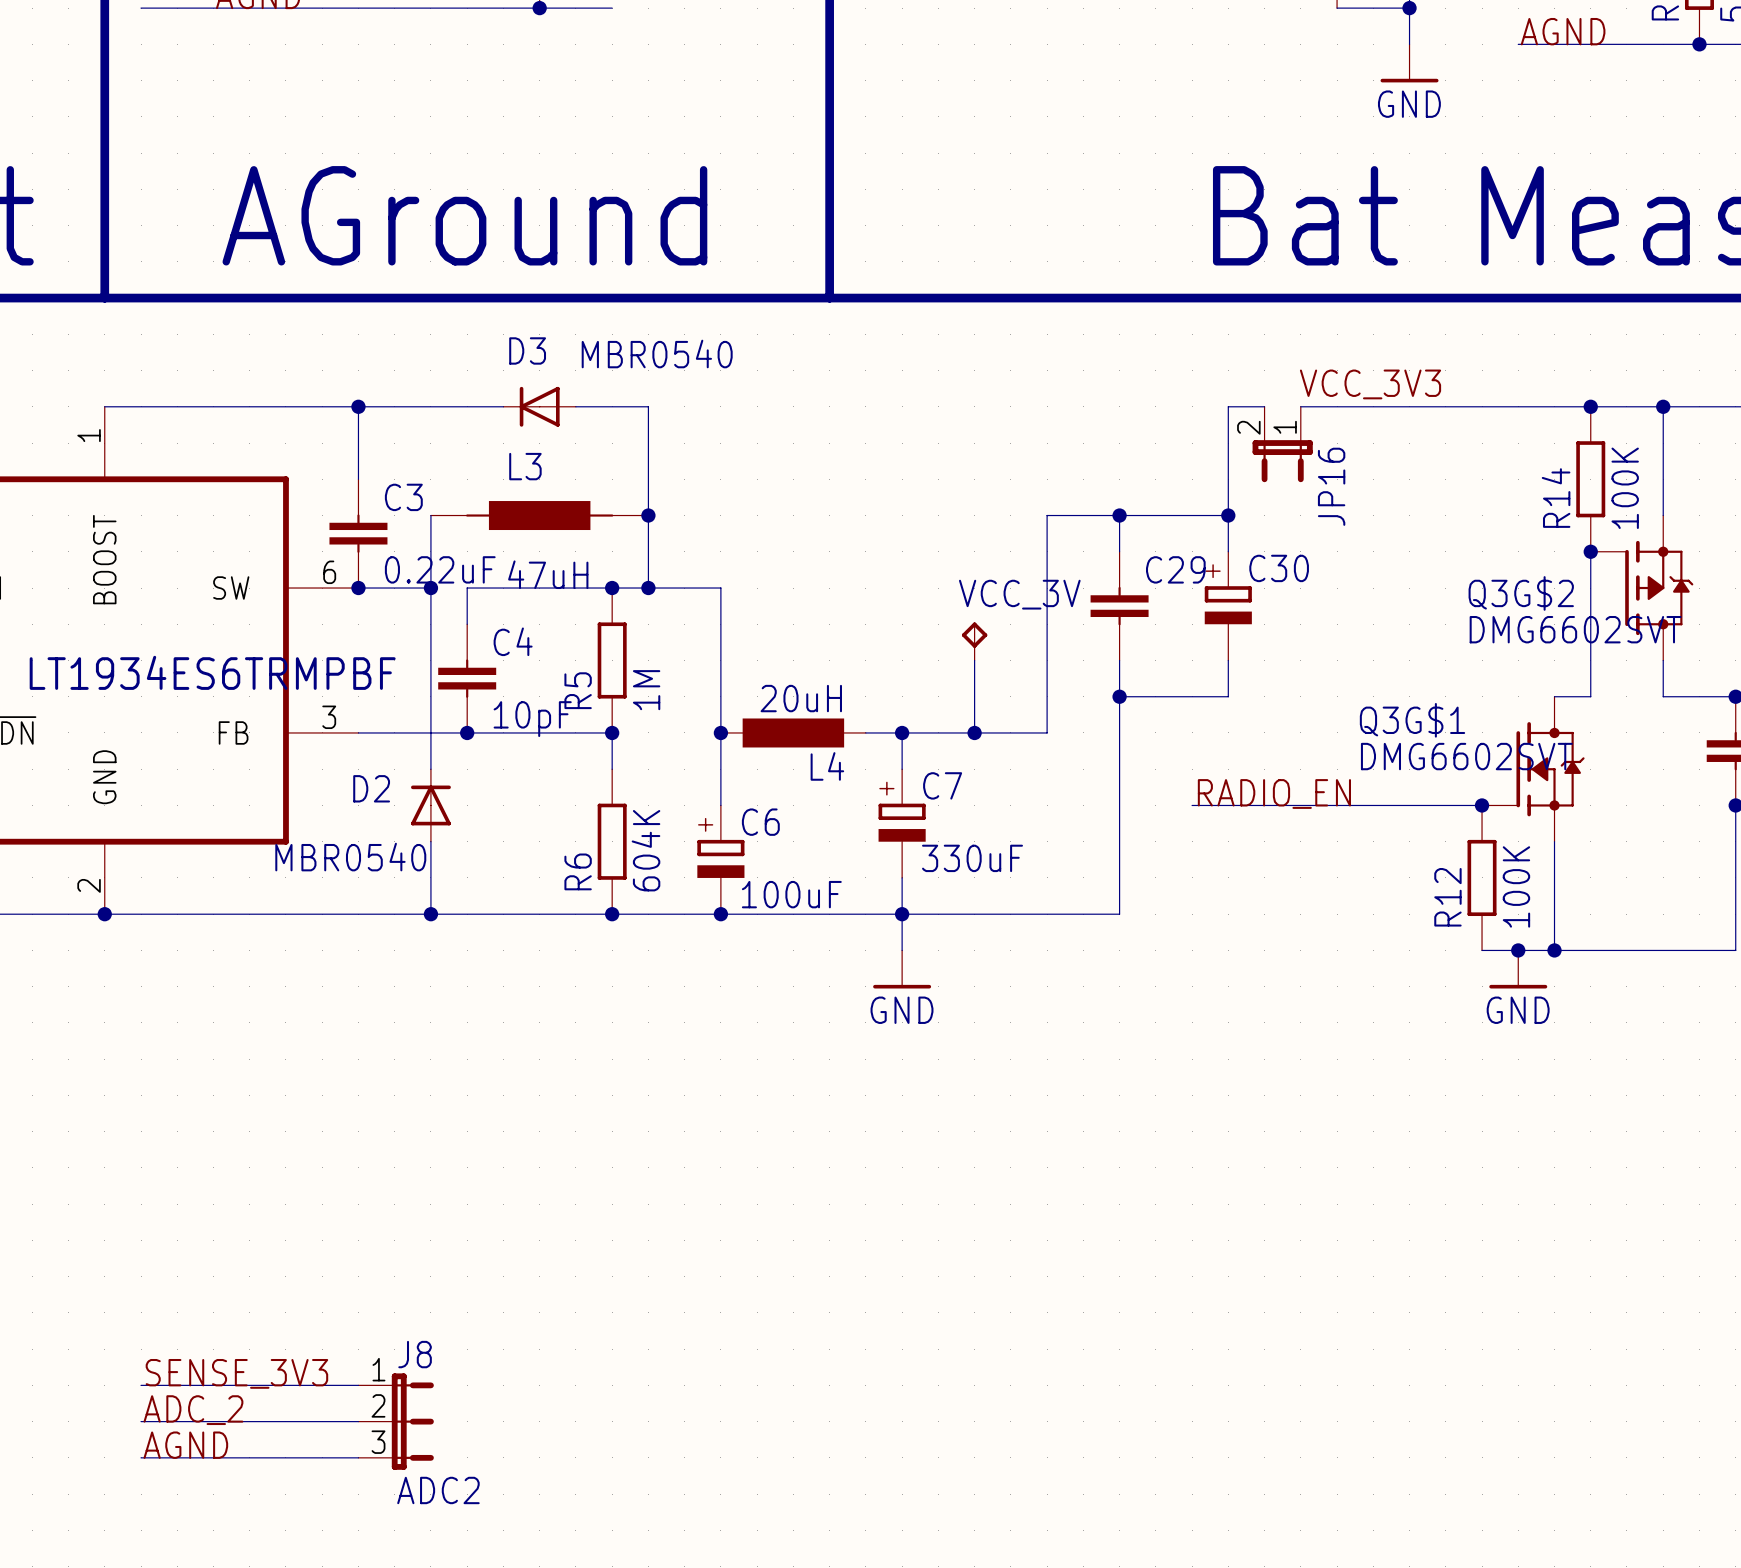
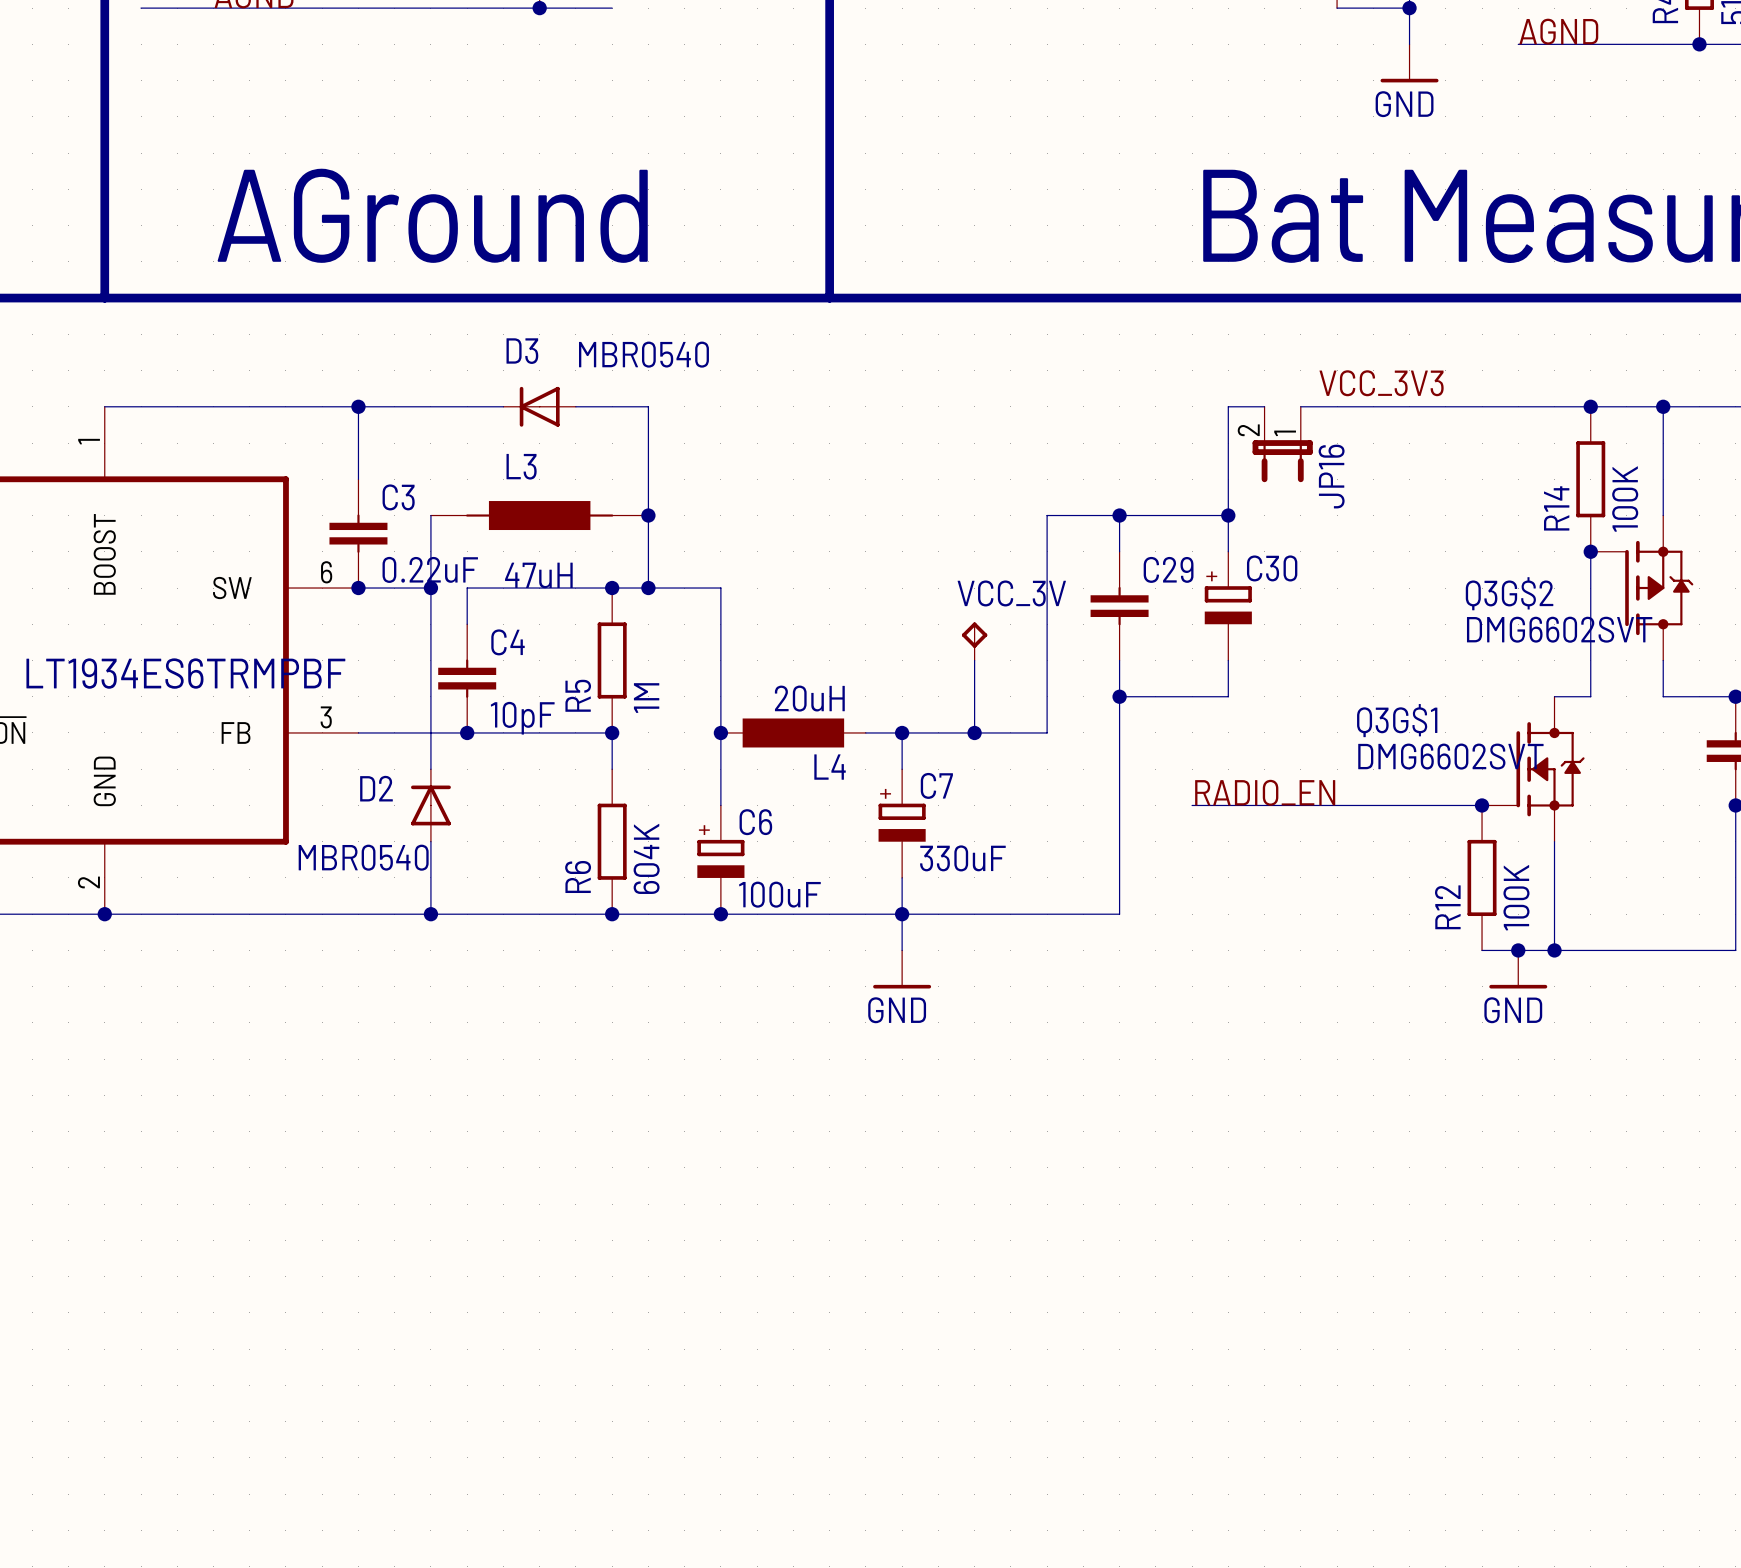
label: SENSE_3V3 (236, 1373) -> none
wire: (141, 1385) (358, 1385) -> none
label: ADC_2 (193, 1410) -> none
wire: (141, 1421) (358, 1421) -> none
J8: ADC2 (396, 1421) -> none
label: AGND (185, 1445) -> none
wire: (141, 1457) (358, 1457) -> none

